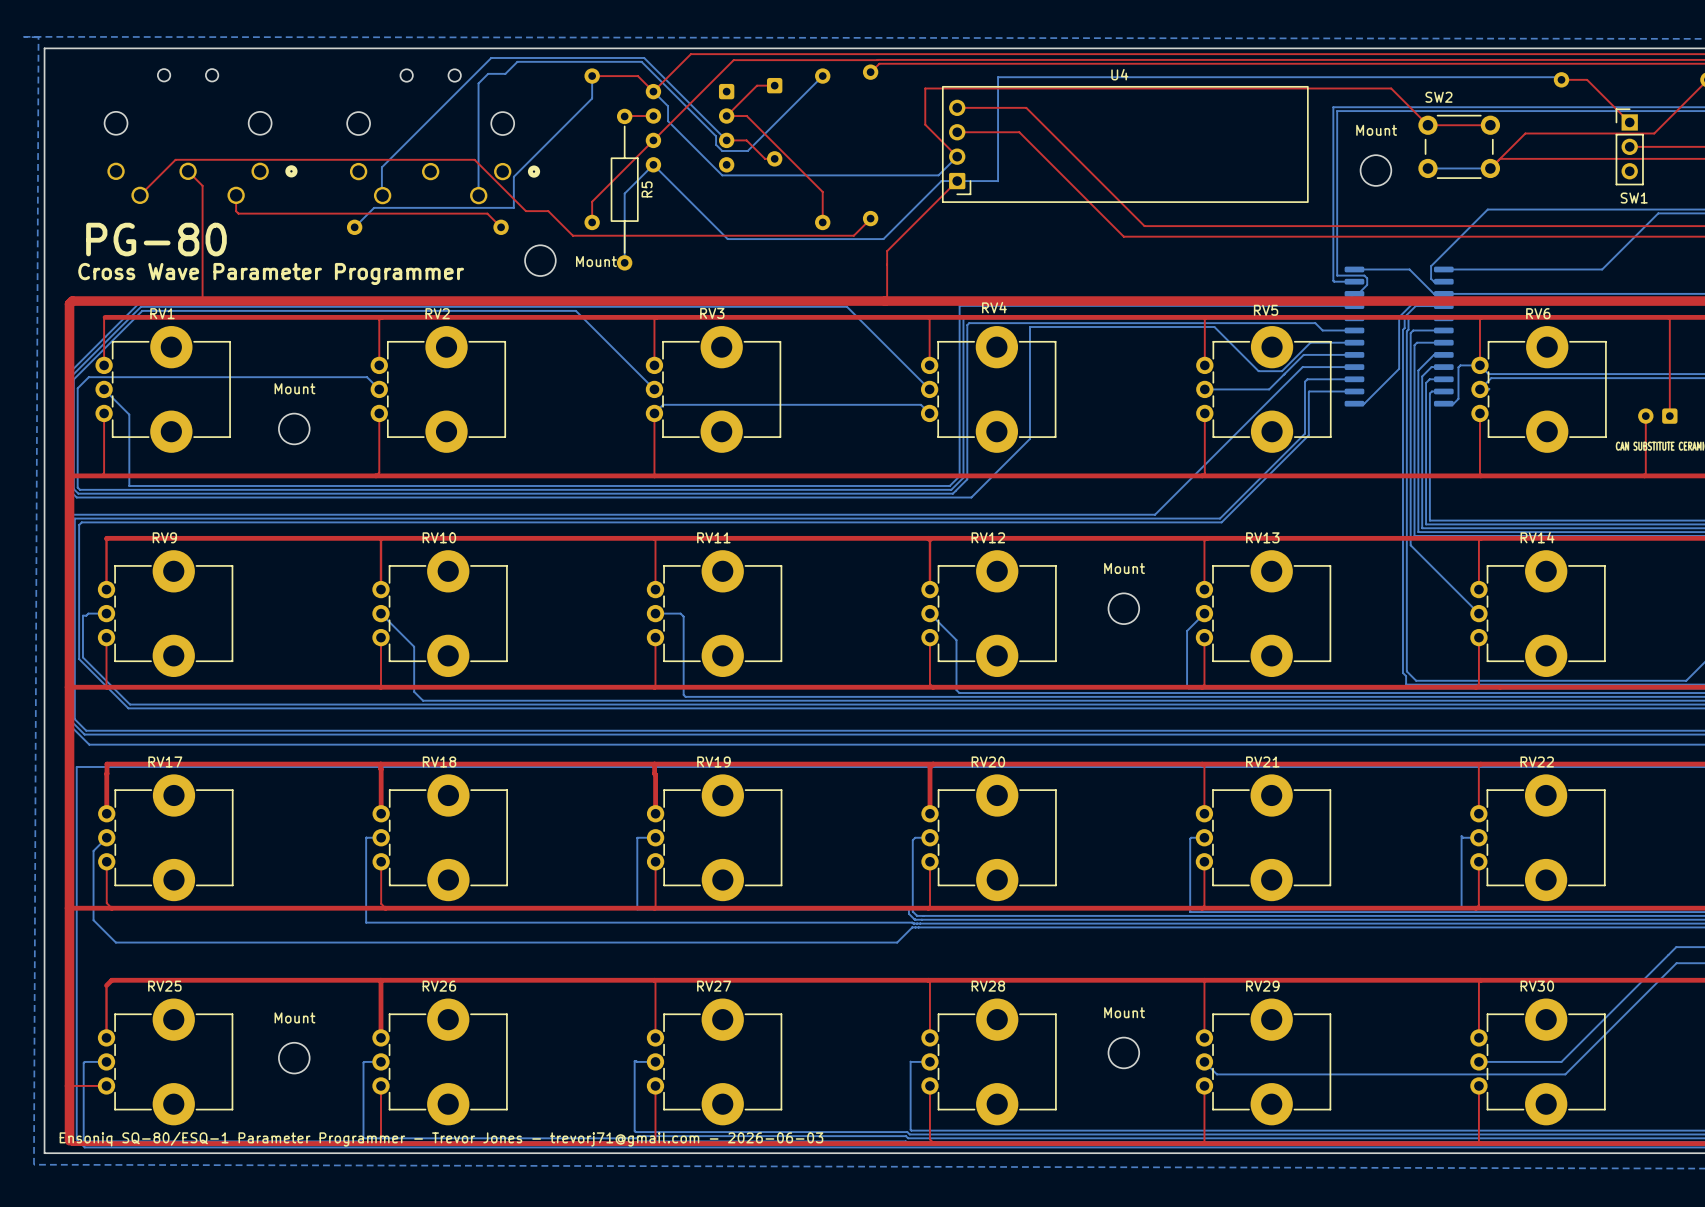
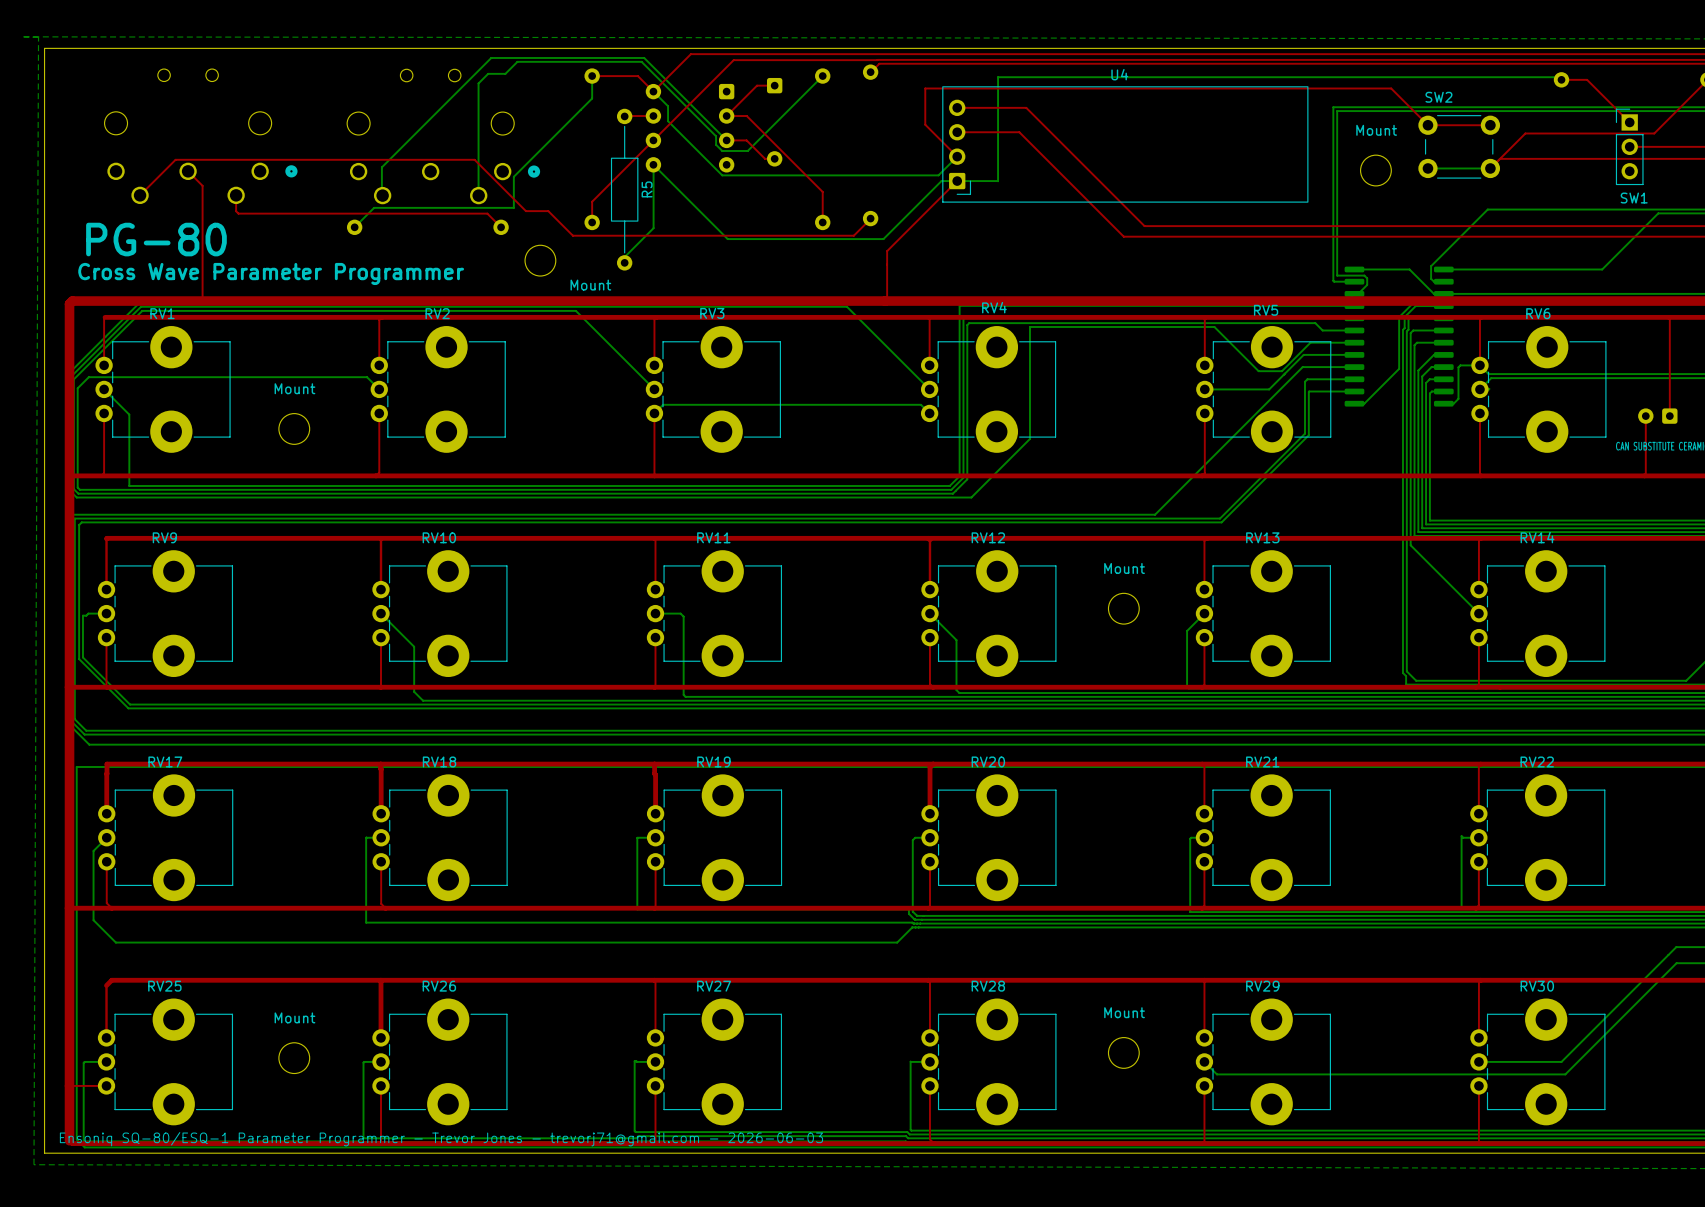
bottom track: (653, 164) (624, 193) (624, 262) -> (653, 164) (653, 228) (621, 259)
Mount name position: Mount (596, 261) -> Mount (590, 285)

